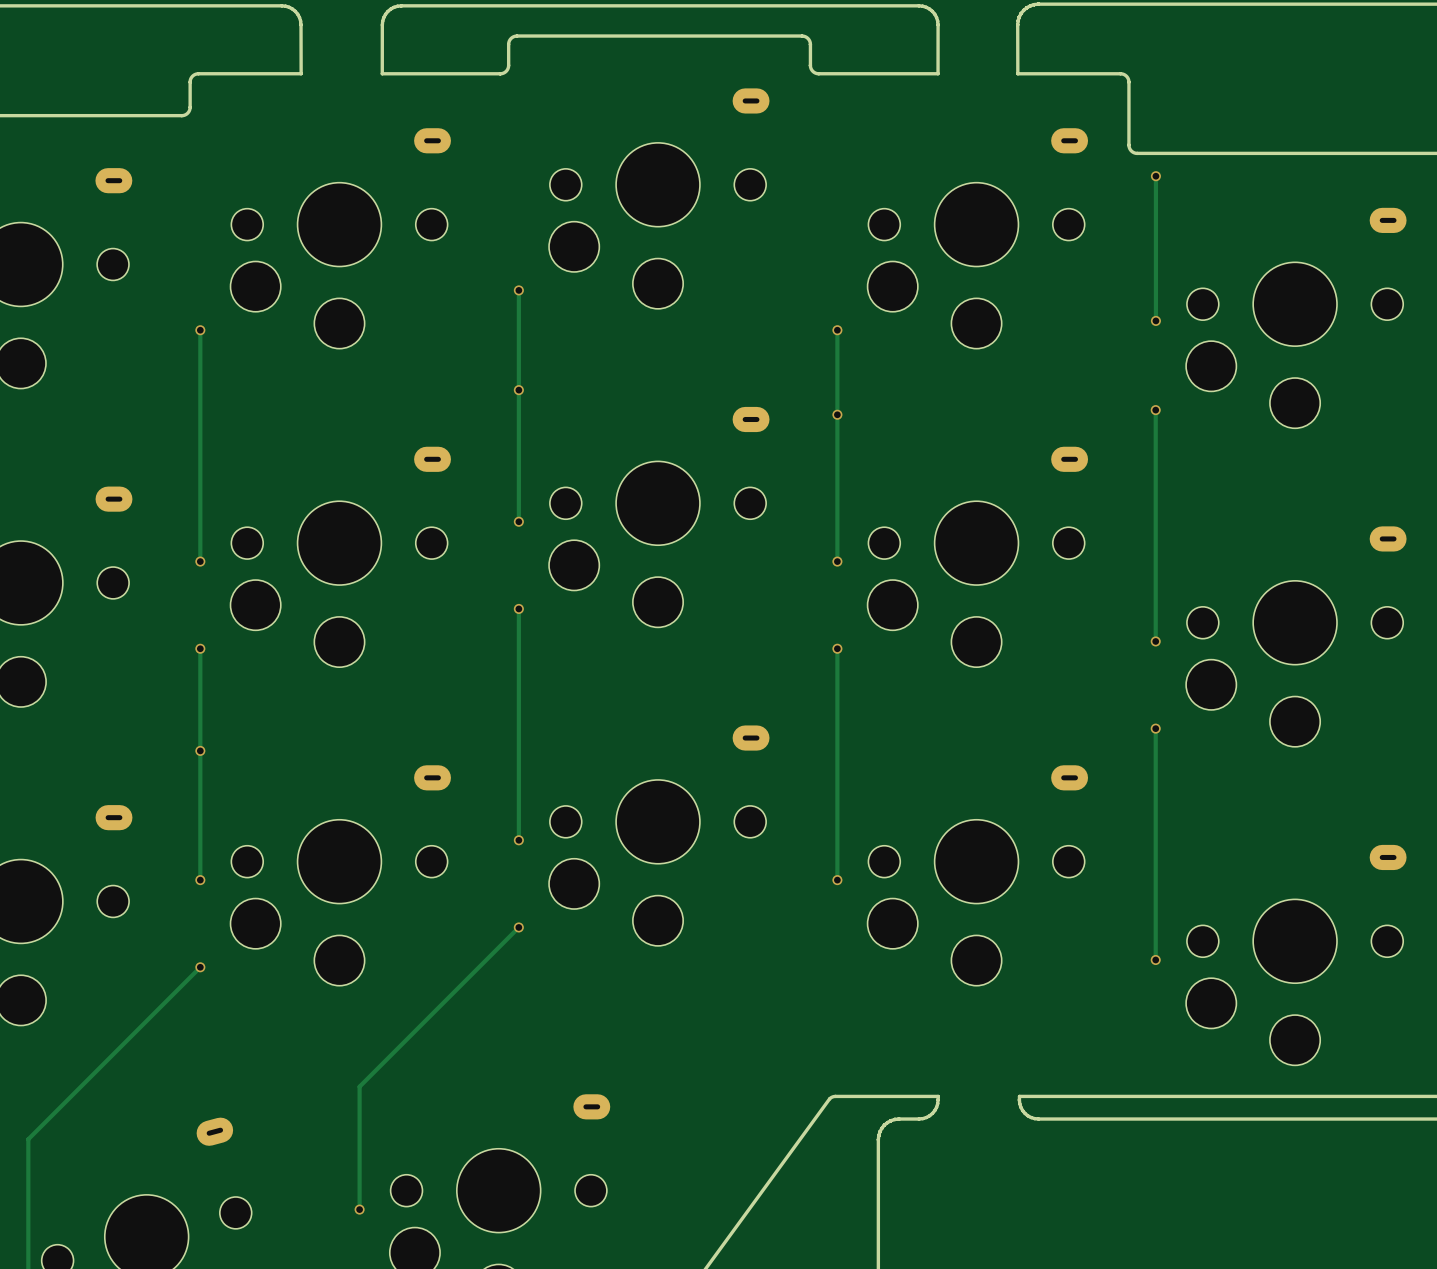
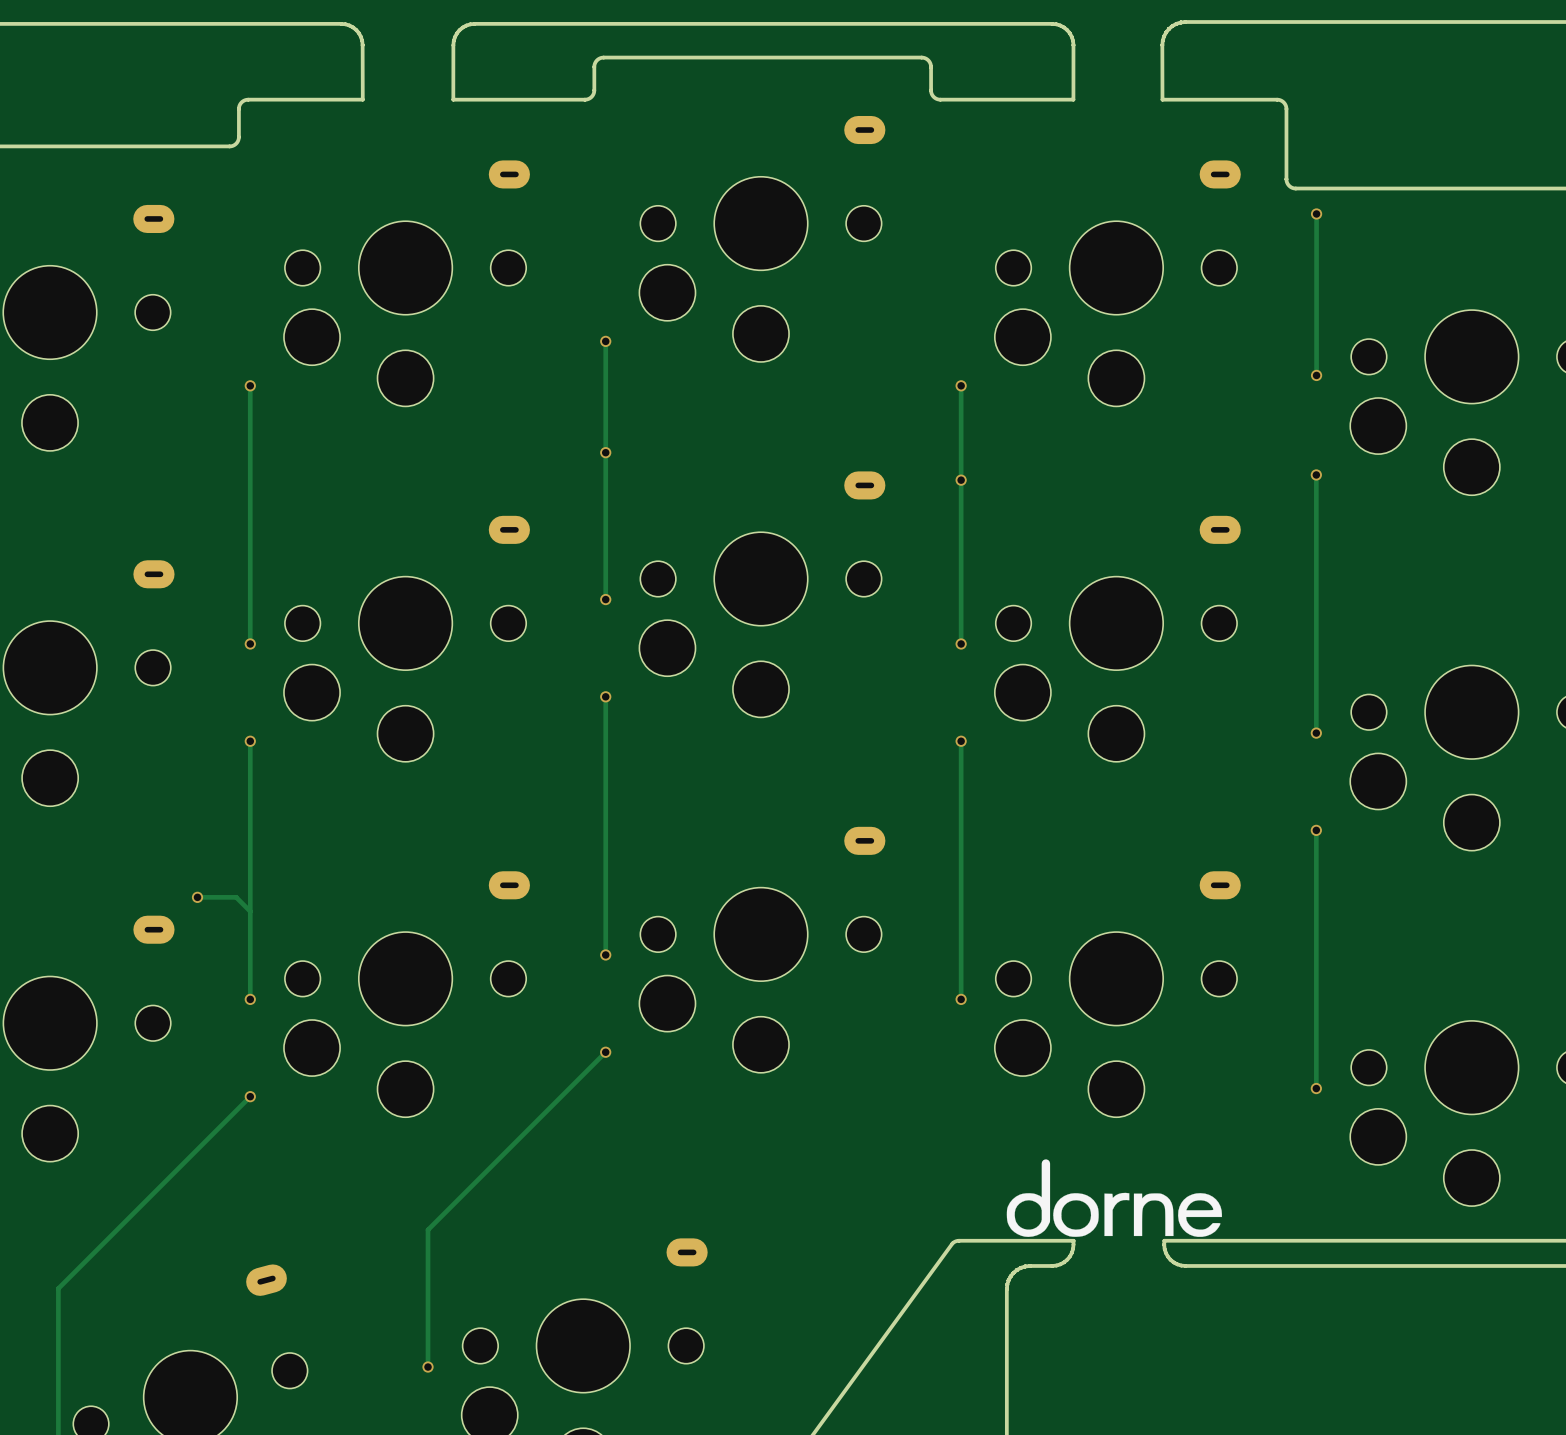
via position: (200, 750) -> (197, 897)
track: none -> (197, 897) (236, 897) (250, 911)
drawing: none -> [1006, 1159, 1222, 1237]

